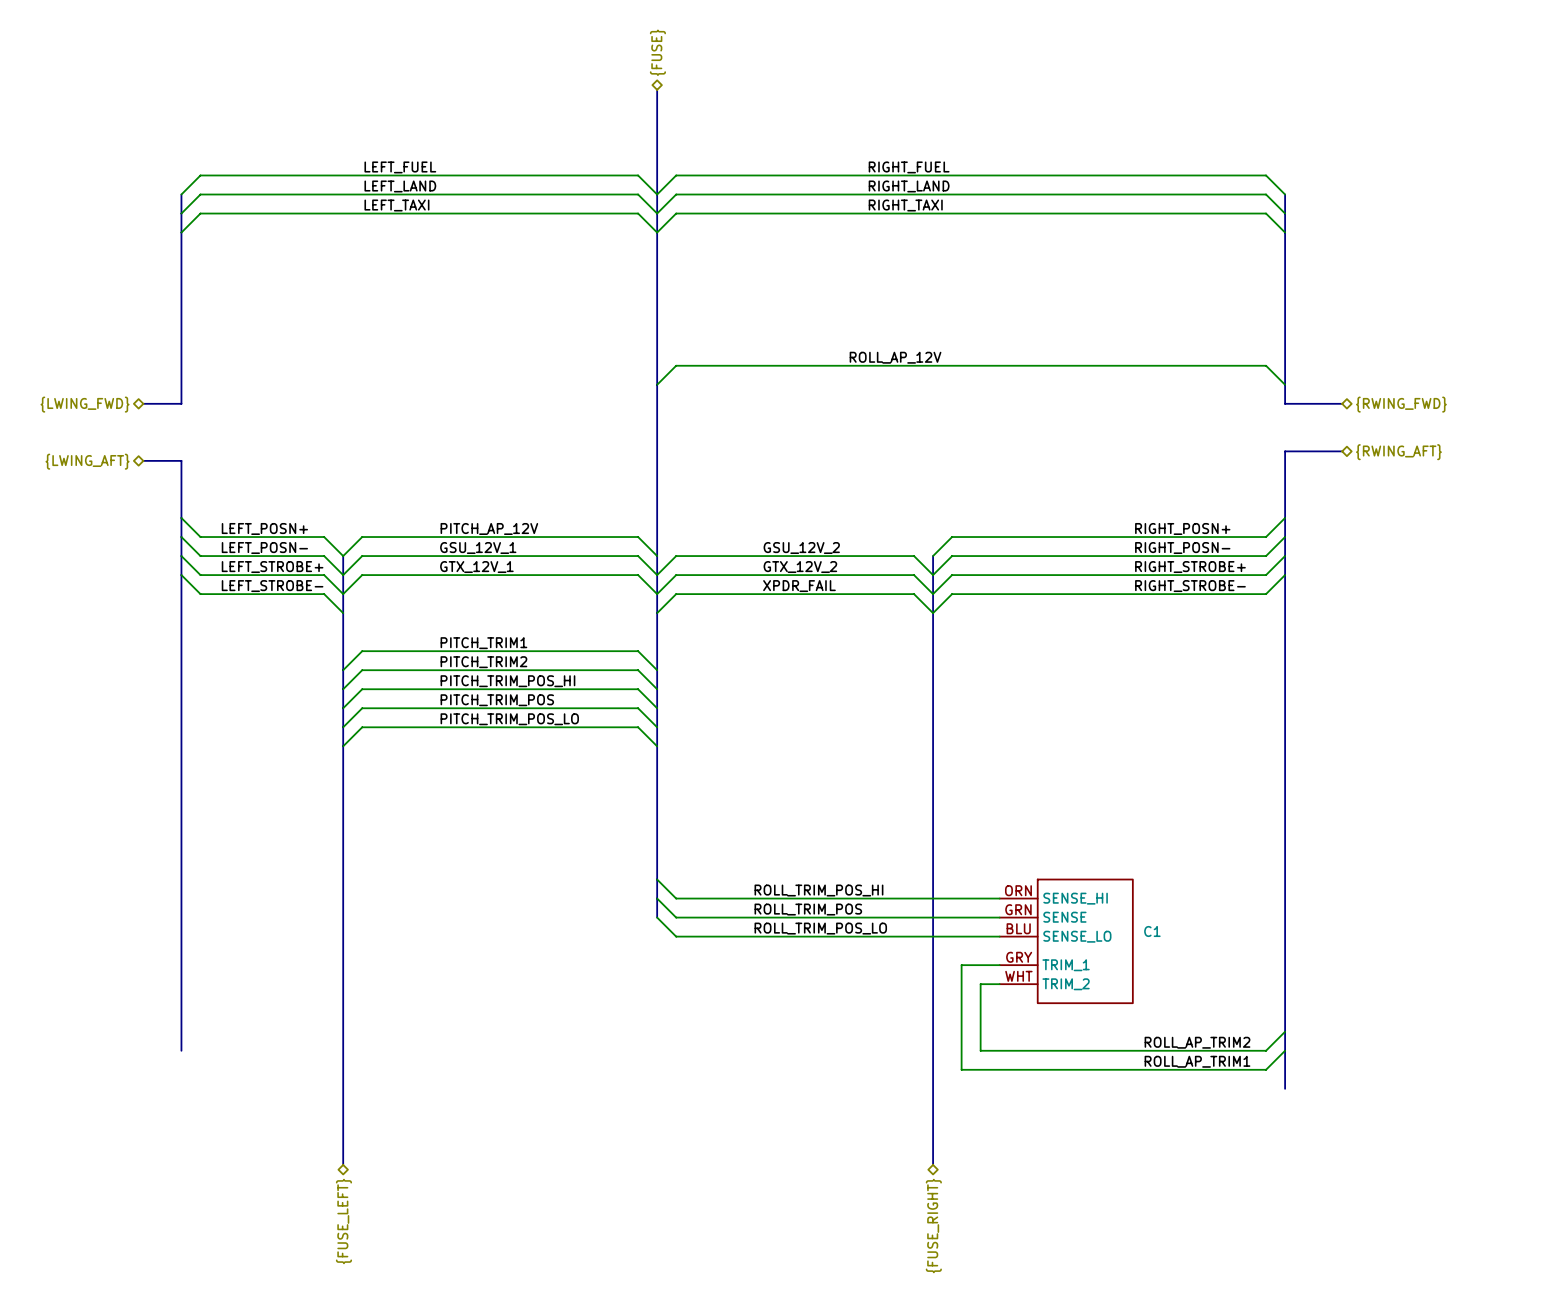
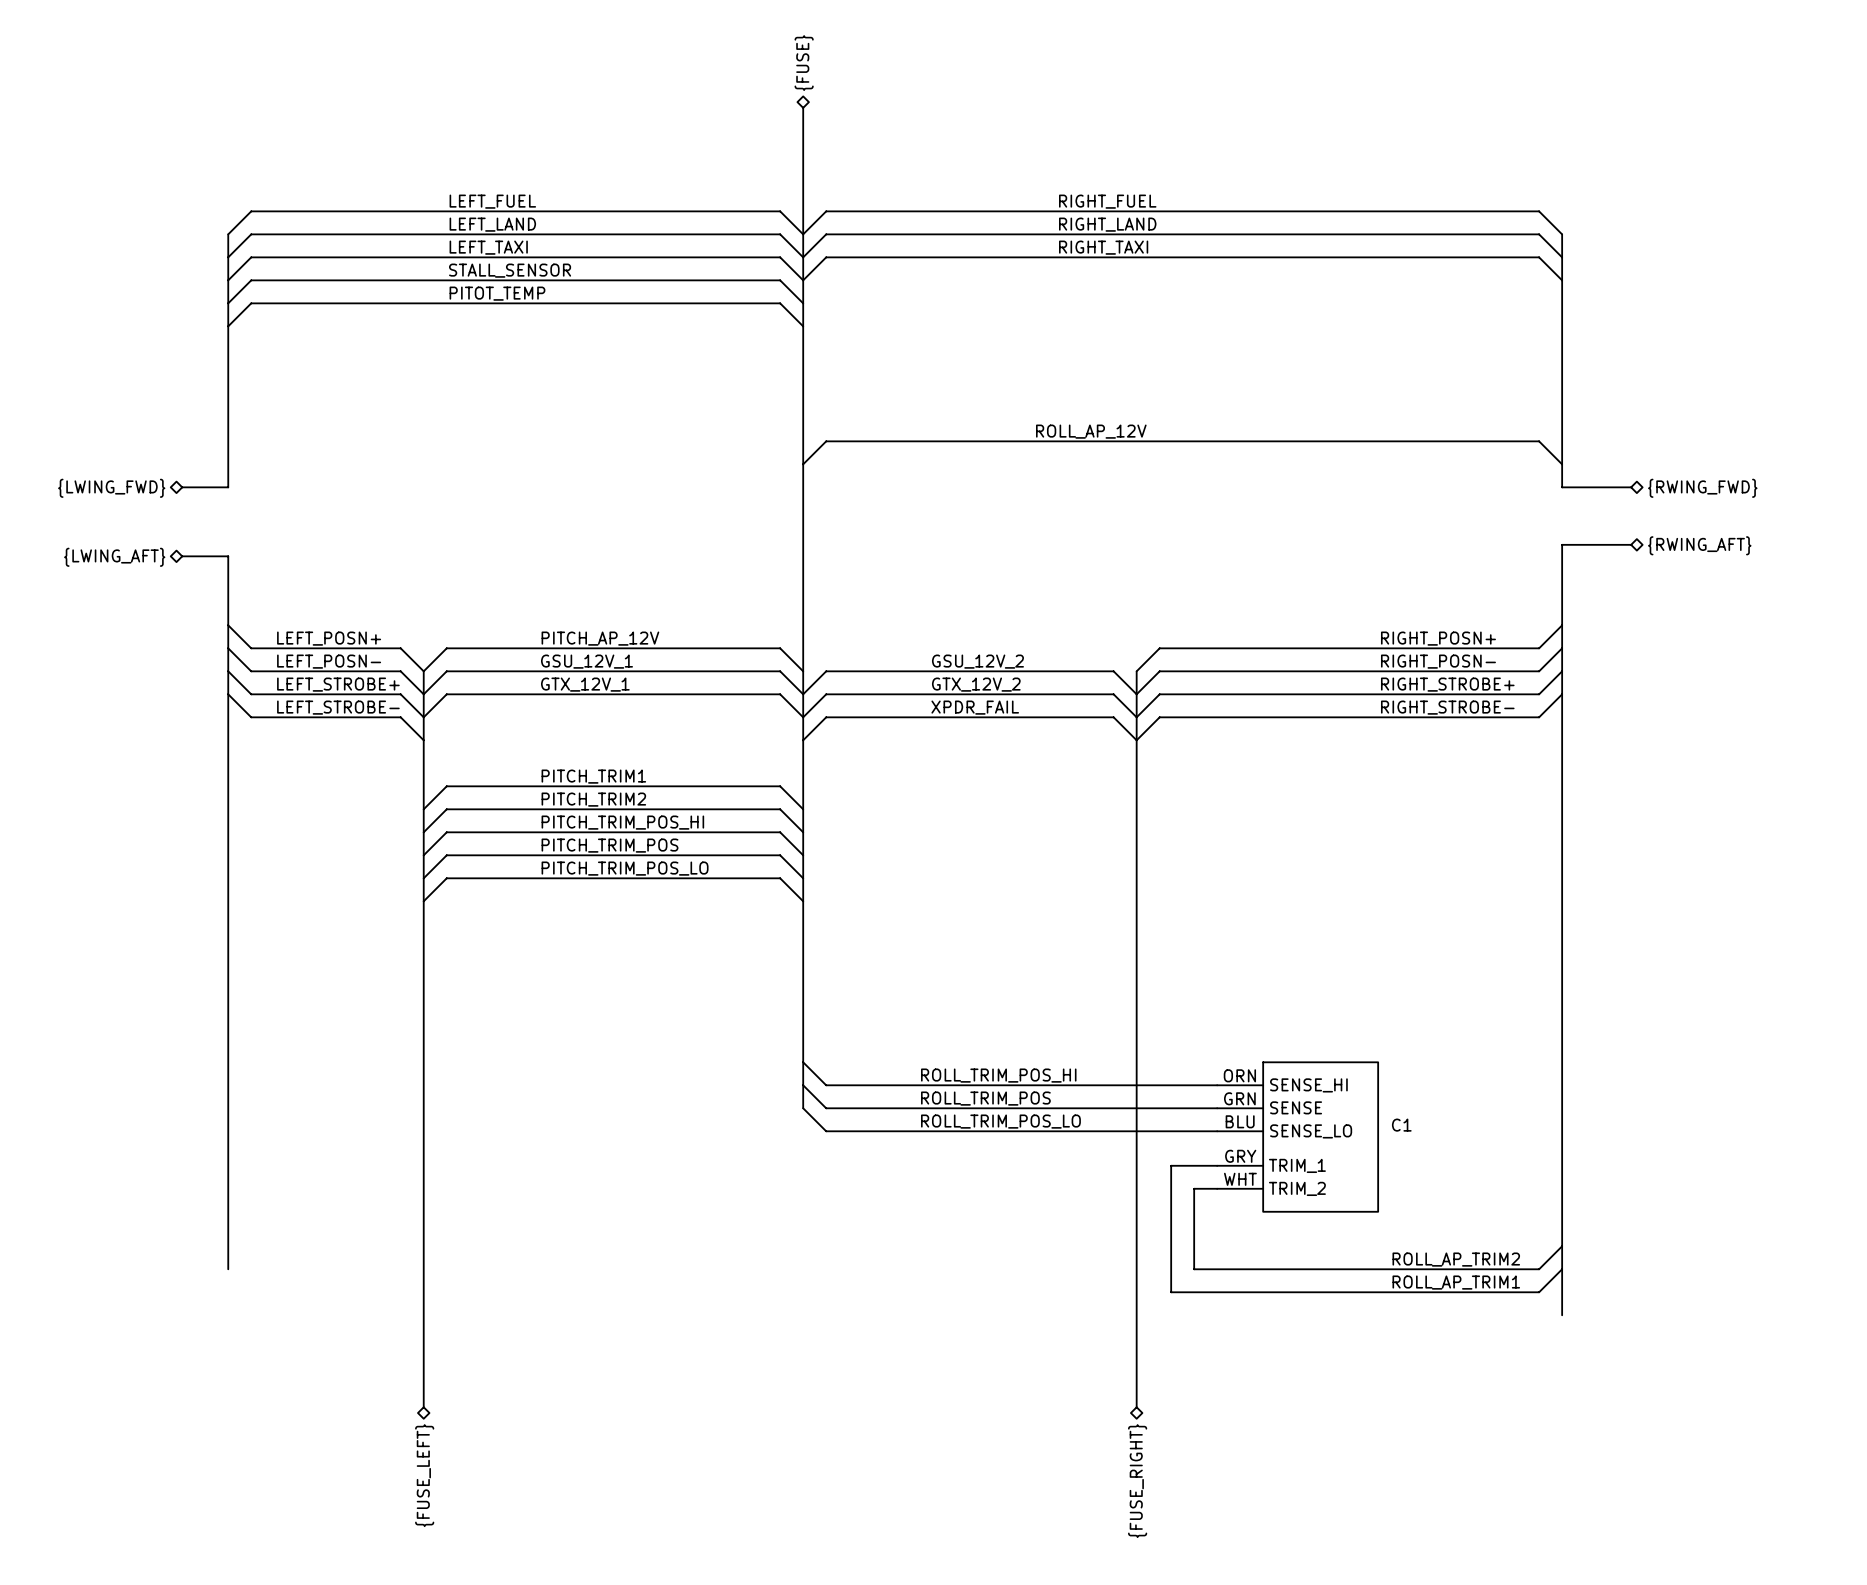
label: none -> STALL_SENSOR (510, 270)
label: none -> PITOT_TEMP (497, 293)
wire: none -> (228, 303) (251, 280) (780, 280) (803, 303)
wire: none -> (228, 326) (251, 303) (780, 303) (803, 326)

